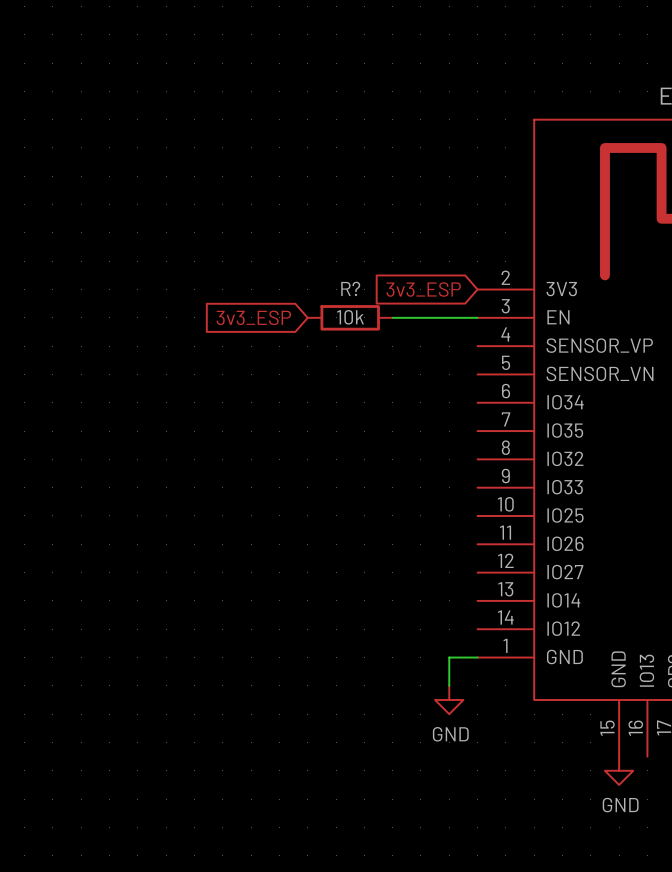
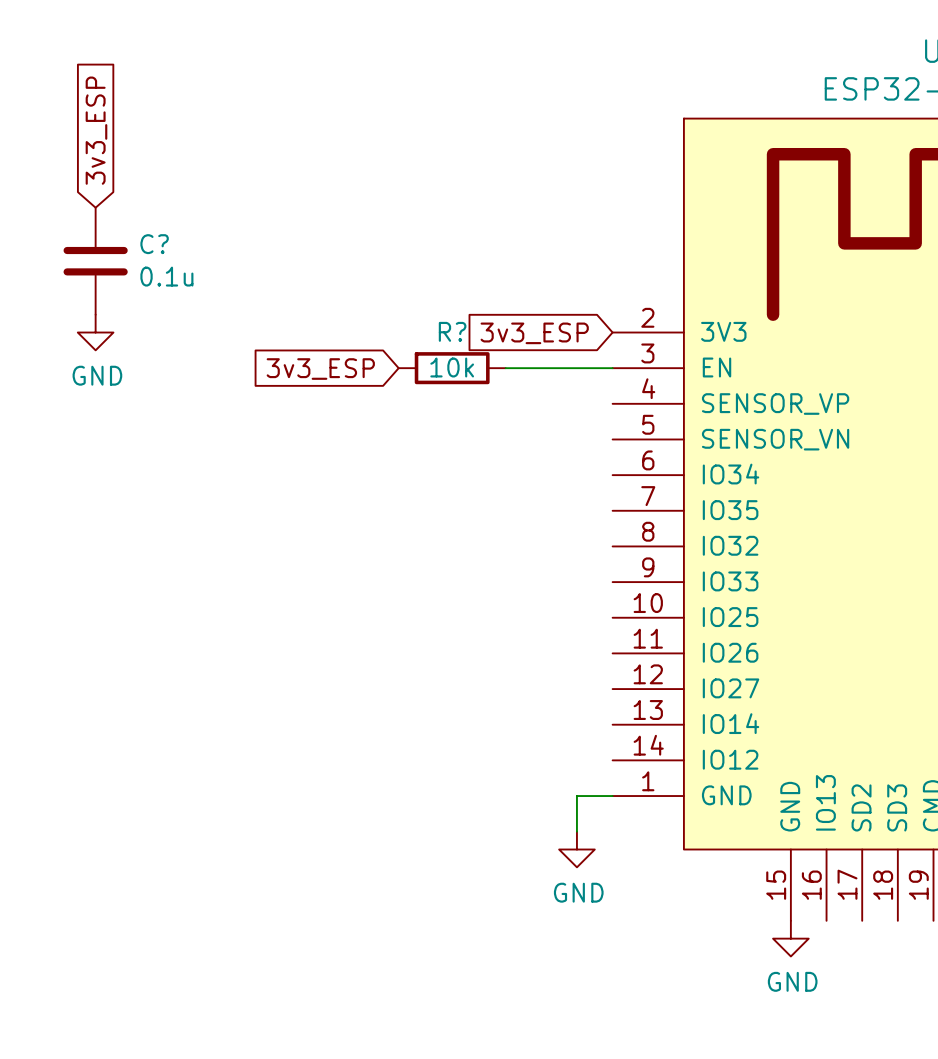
global label: none -> 3v3_ESP (96, 130)
C?: none -> 0.1u (95, 261)
power symbol: none -> GND (95, 332)

